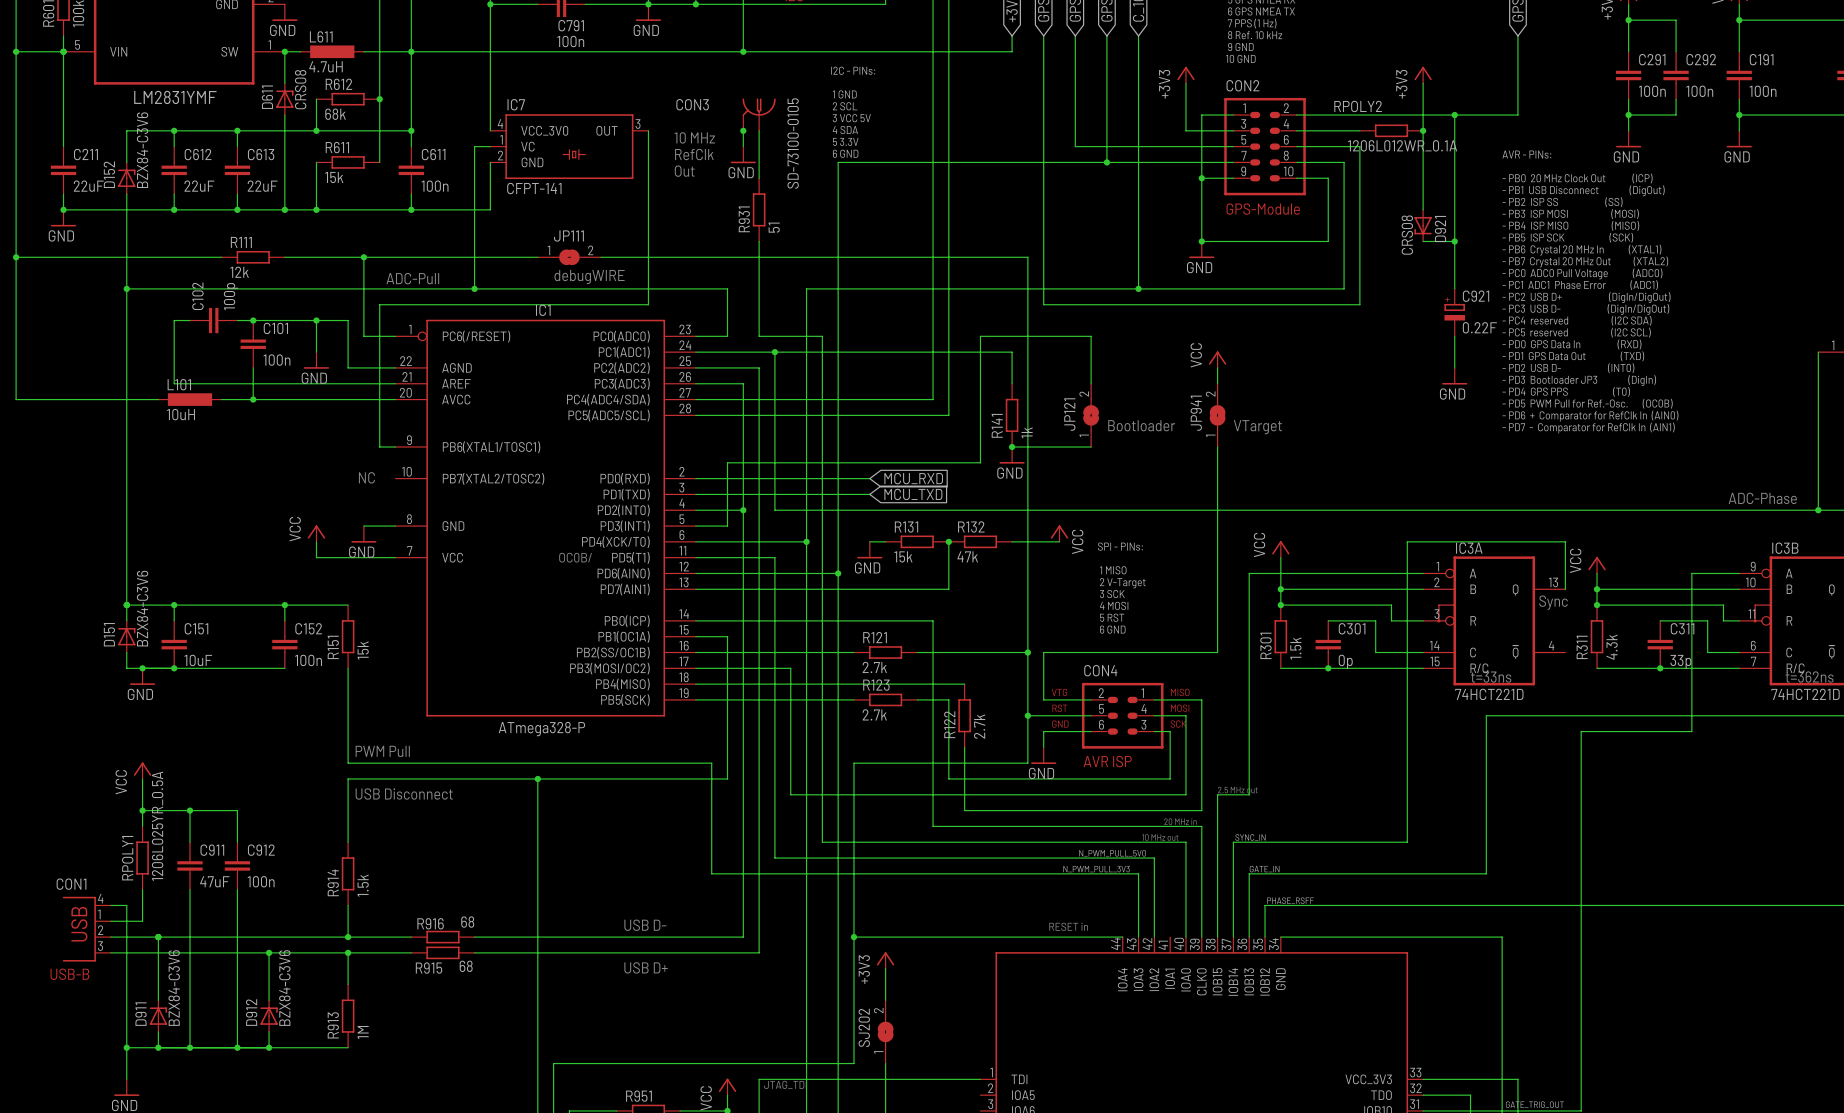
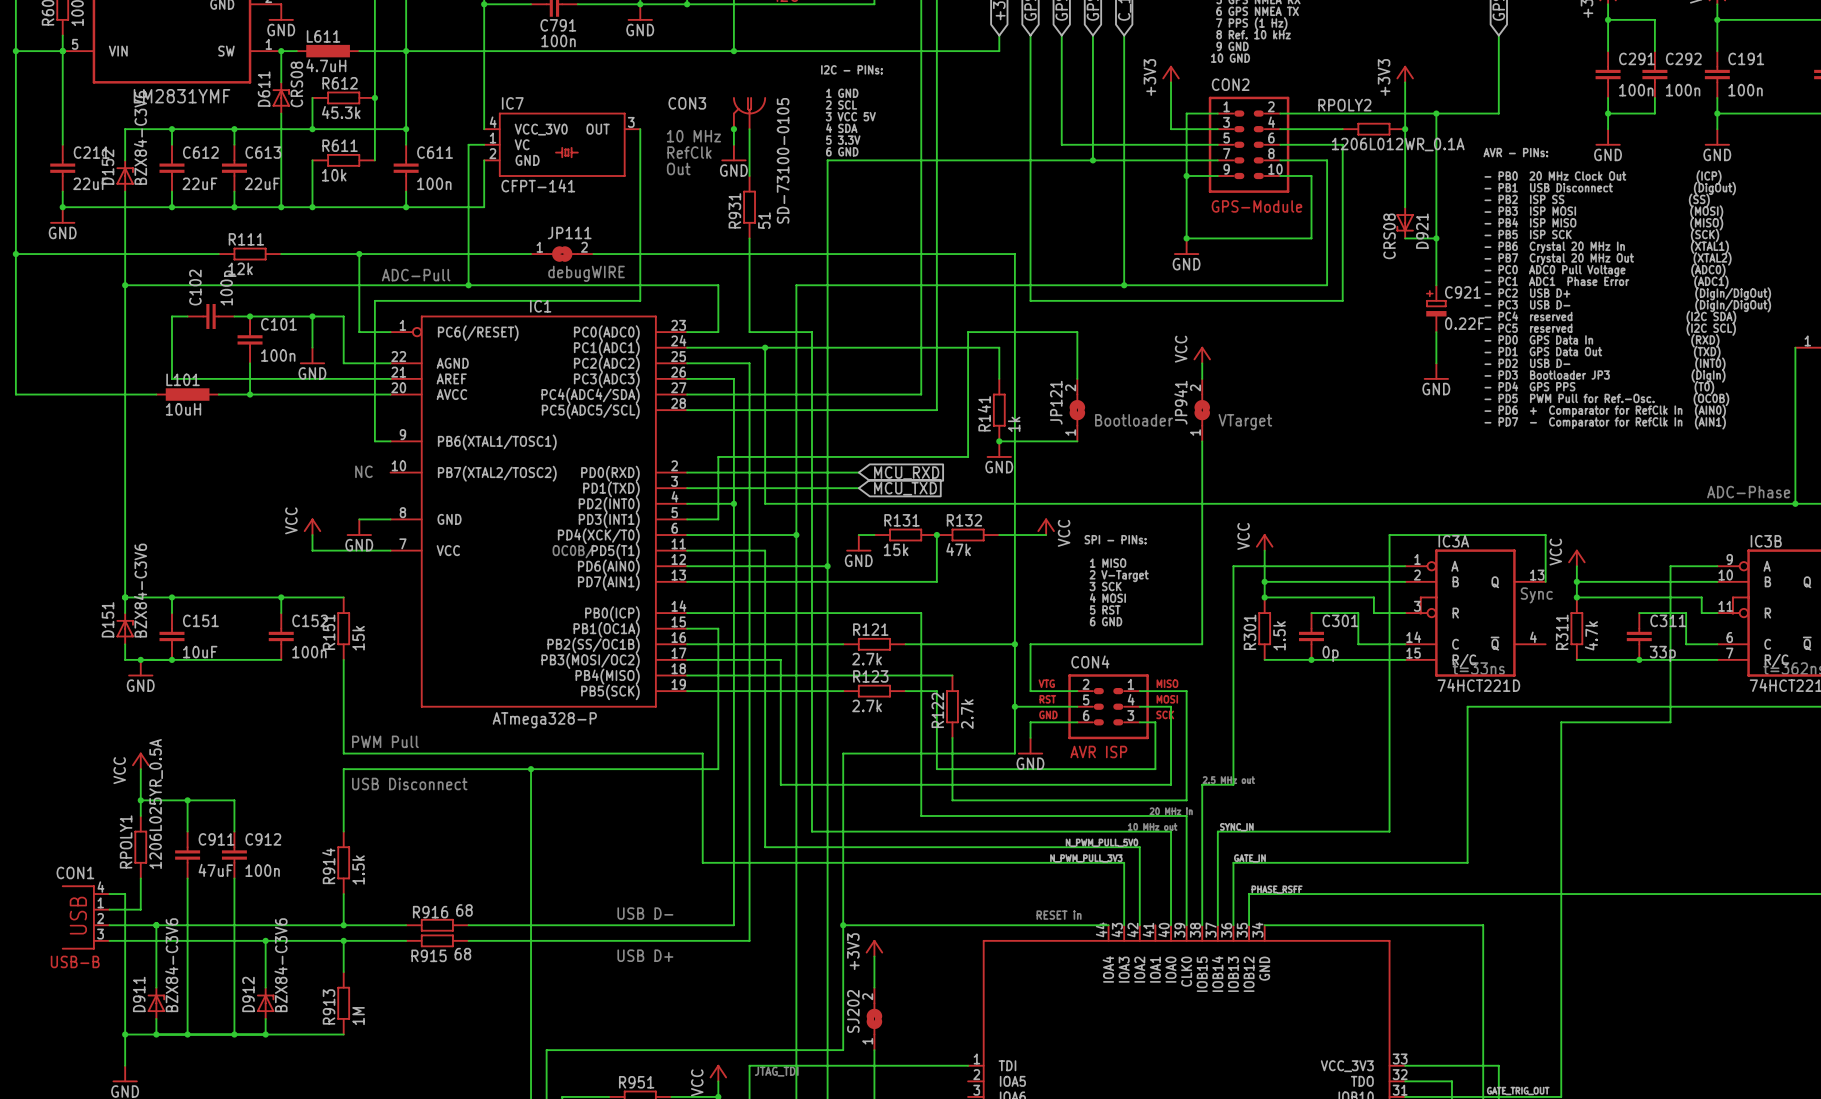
R612 value: 68k (335, 114) -> 45.3k (341, 112)
R611 value: 15k (334, 177) -> 10k (334, 175)
R311 value: 4.3k (1612, 647) -> 4.7k (1591, 635)

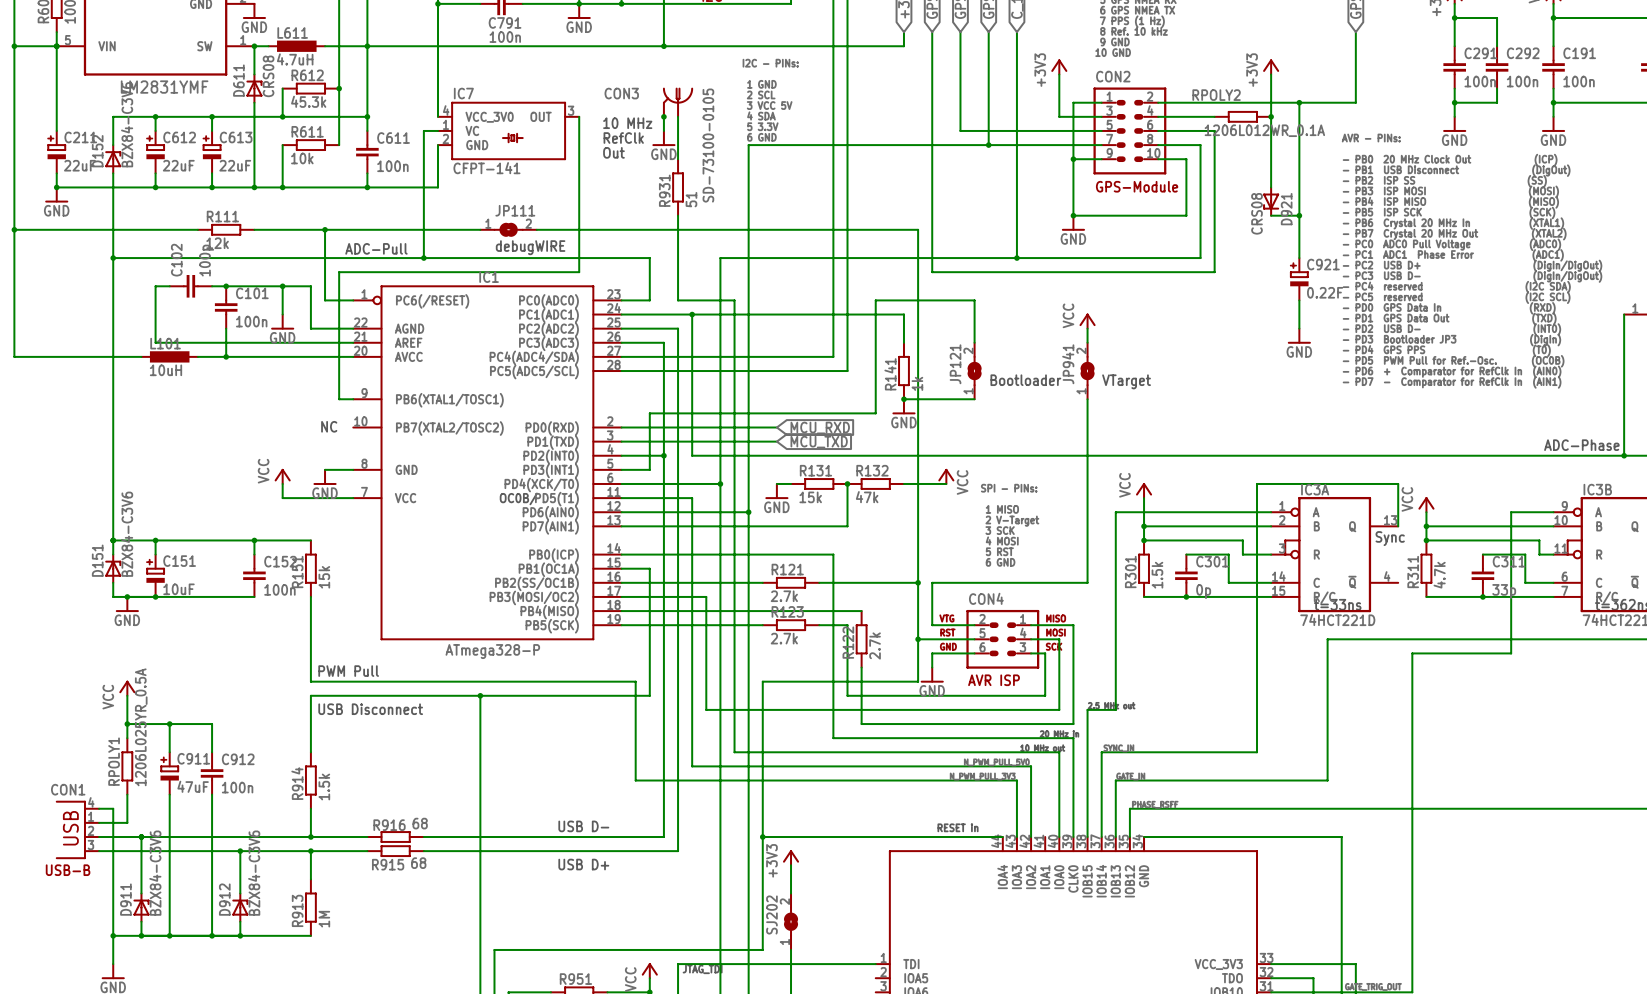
C211 symbol: [50, 144, 76, 192] -> [47, 130, 66, 174]
C612 symbol: [159, 144, 185, 192] -> [146, 130, 165, 174]
C613 symbol: [221, 144, 247, 192] -> [202, 130, 222, 174]
C151 symbol: [159, 613, 185, 660] -> [146, 554, 165, 597]
C911 symbol: [175, 831, 201, 879] -> [160, 752, 179, 795]

